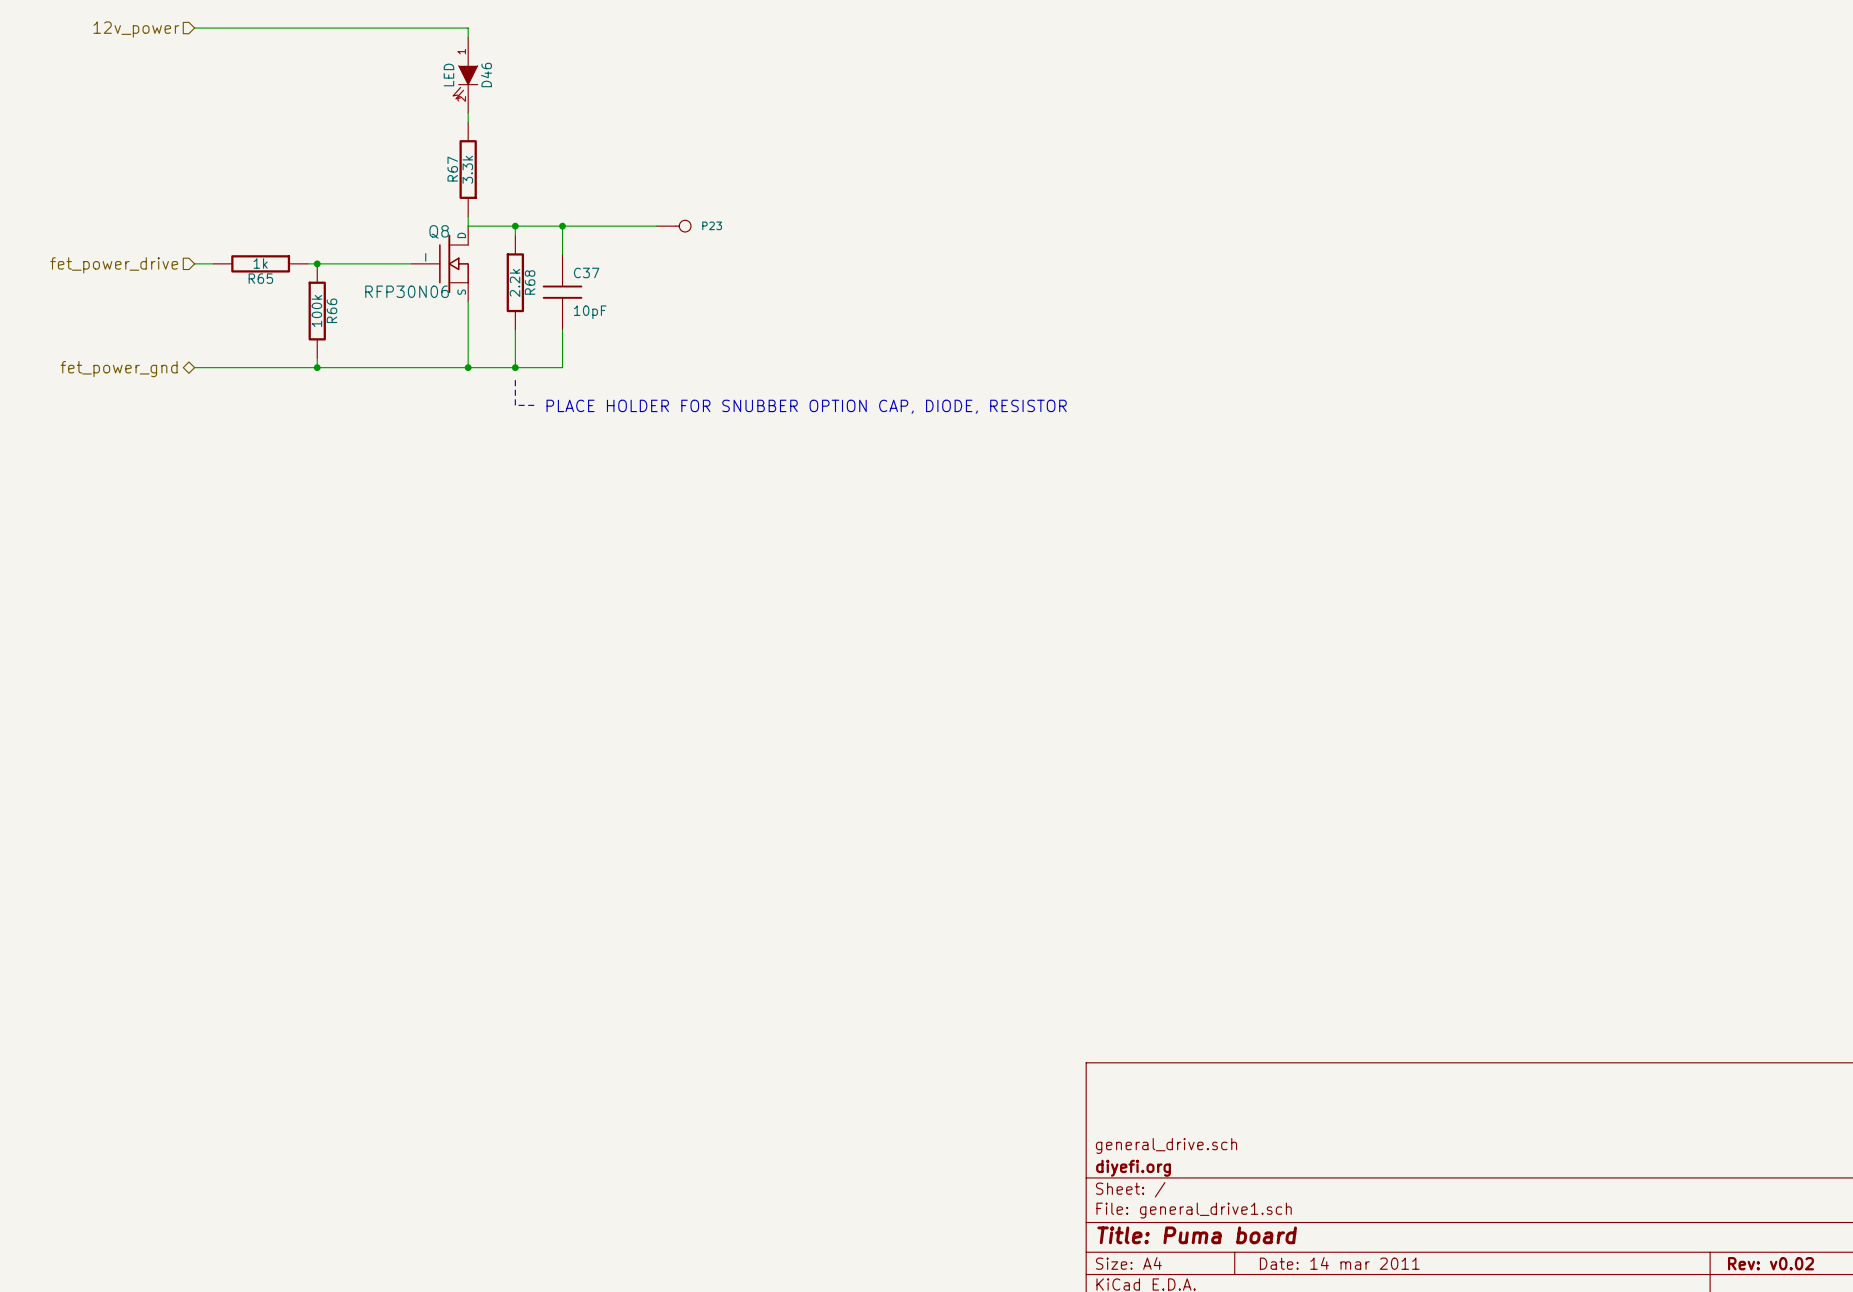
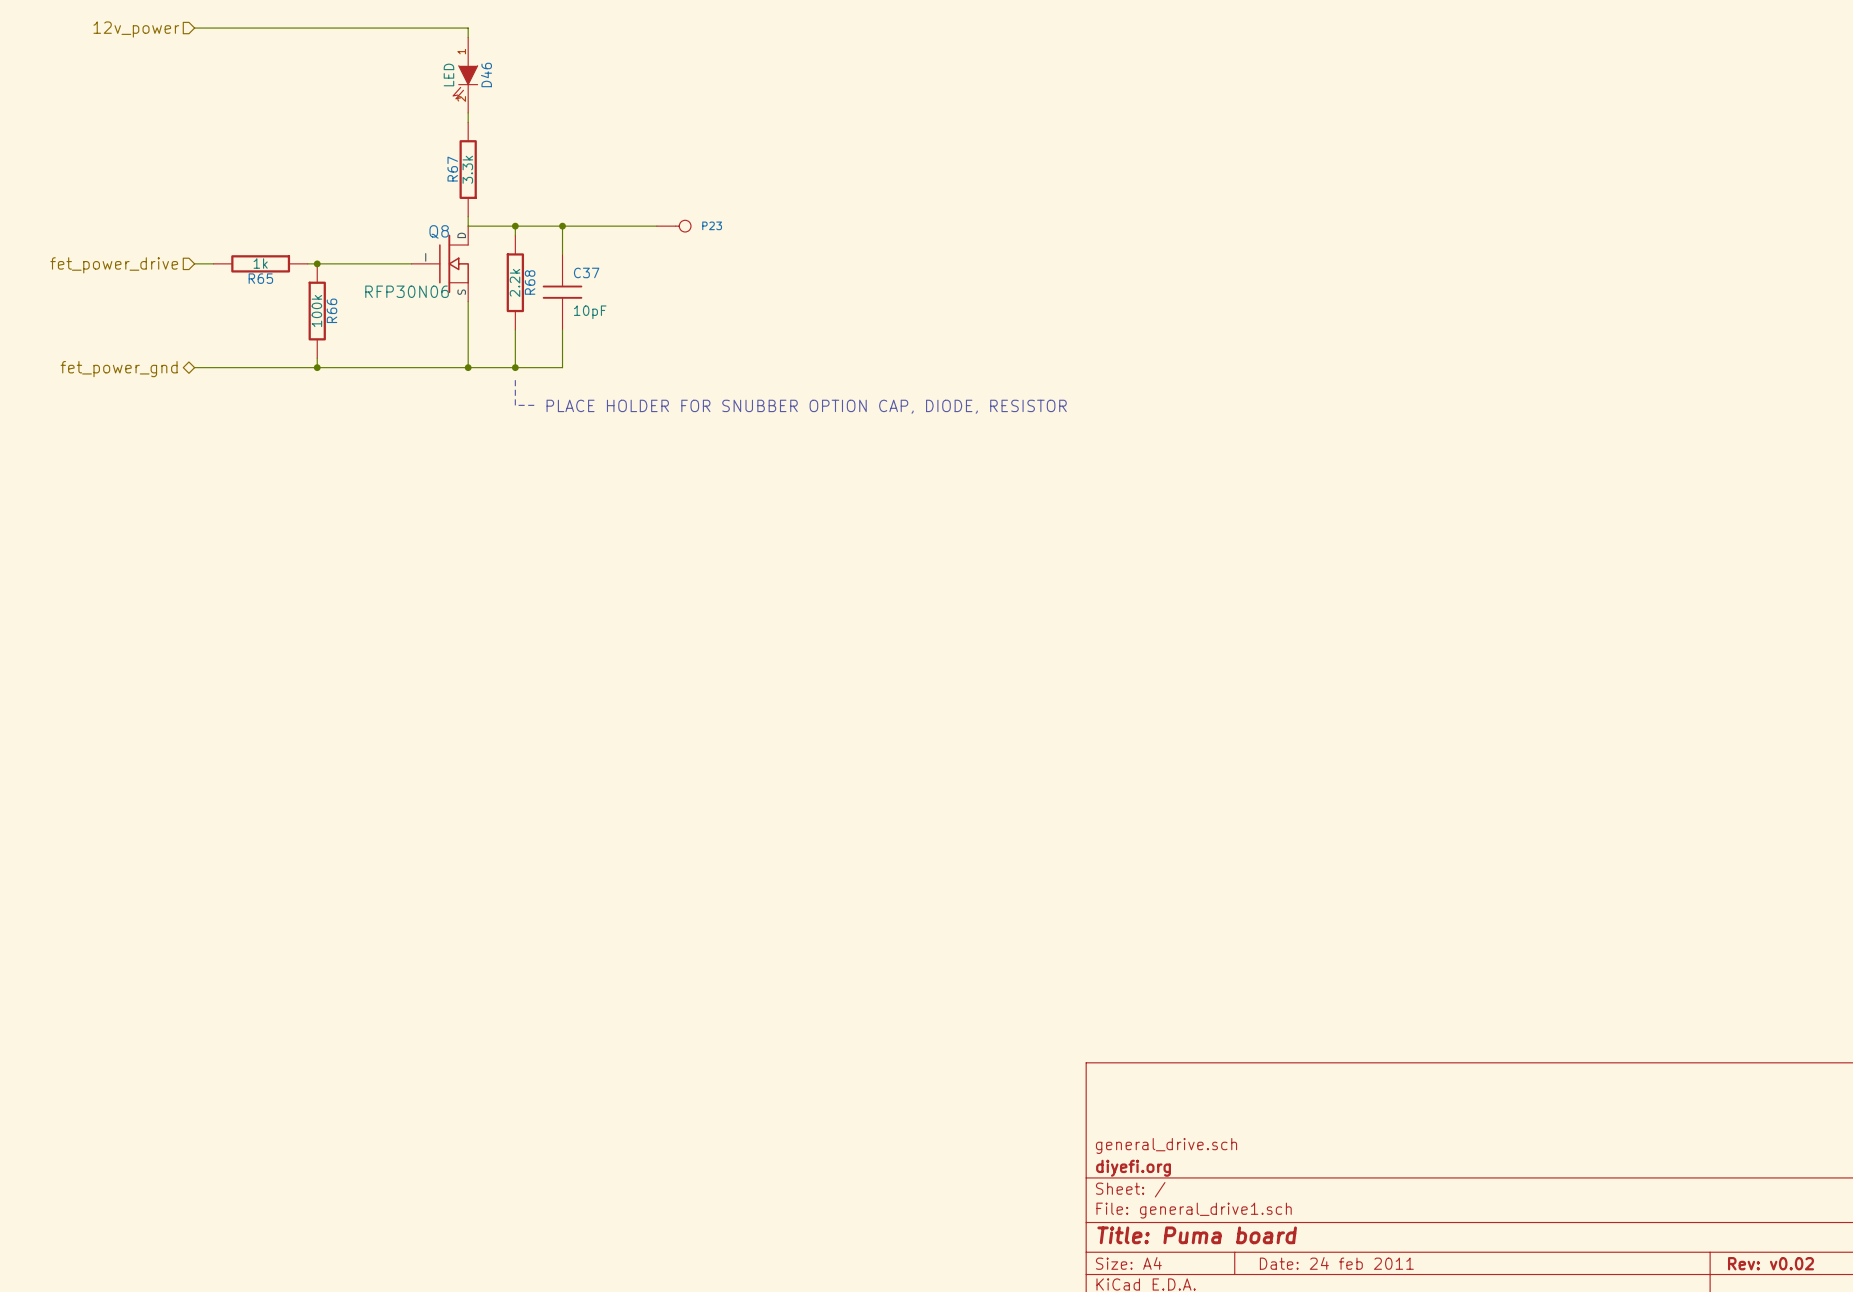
title block: Date: 14 mar 2011 (1339, 1263) -> Date: 24 feb 2011 (1336, 1263)

